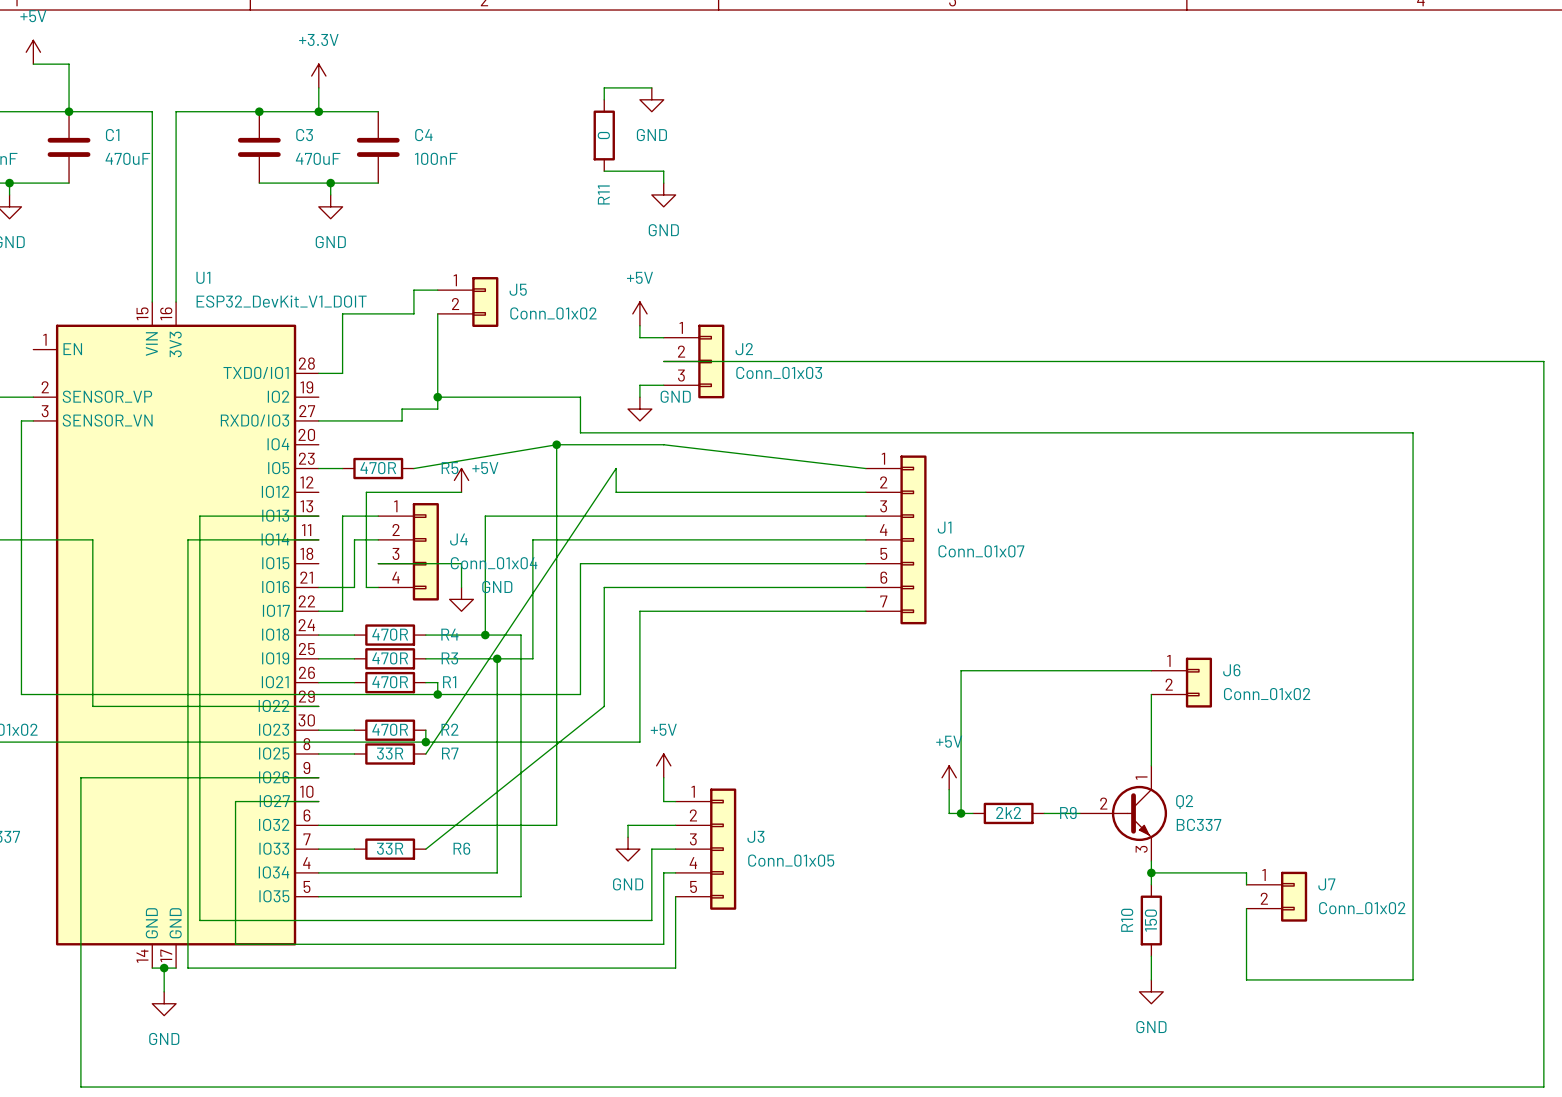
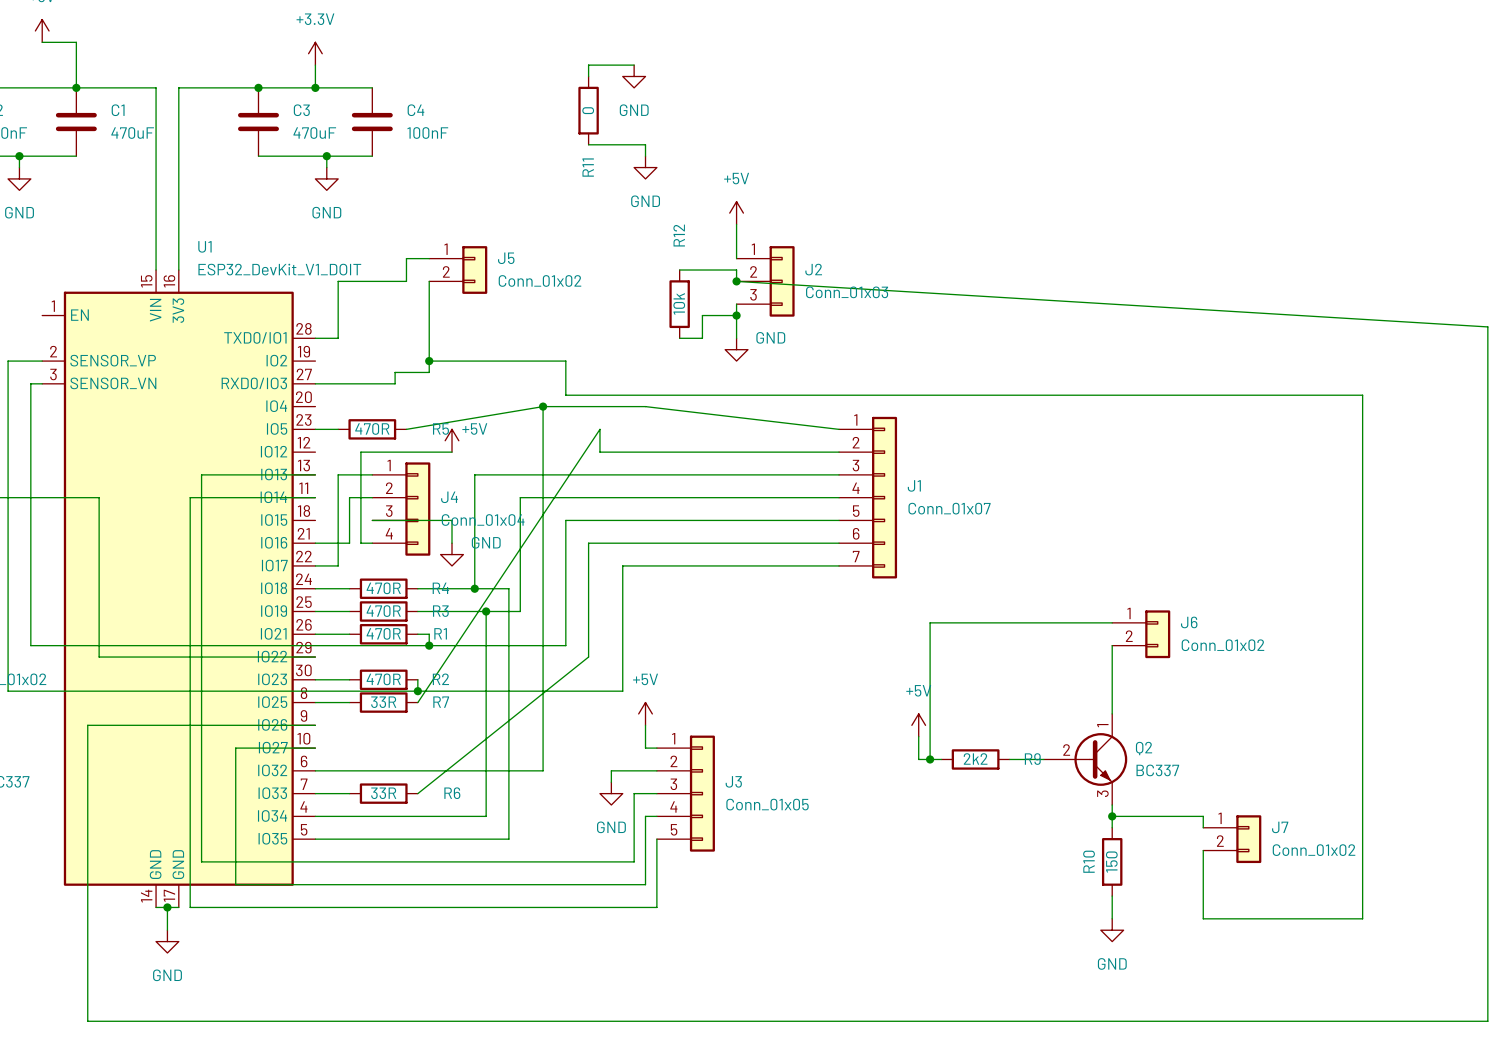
wire: none -> (736, 224) (736, 258)
power symbol position: +5V (639, 313) -> +5V (736, 213)
junction: none -> (736, 281)
wire: (639, 325) (639, 337) (663, 337) -> none
R12: none -> 10k (679, 304)
wire: none -> (736, 304) (736, 338)
wire: none -> (736, 315) (702, 315) (702, 338) (679, 338)
junction: none -> (736, 315)
wire: (663, 361) (1543, 361) -> (679, 270) (736, 270) (736, 281) (1487, 326)
J2 position: (694, 361) -> (765, 281)
wire: (663, 385) (639, 385) (639, 397) -> none
power symbol position: GND (639, 409) -> GND (736, 349)

